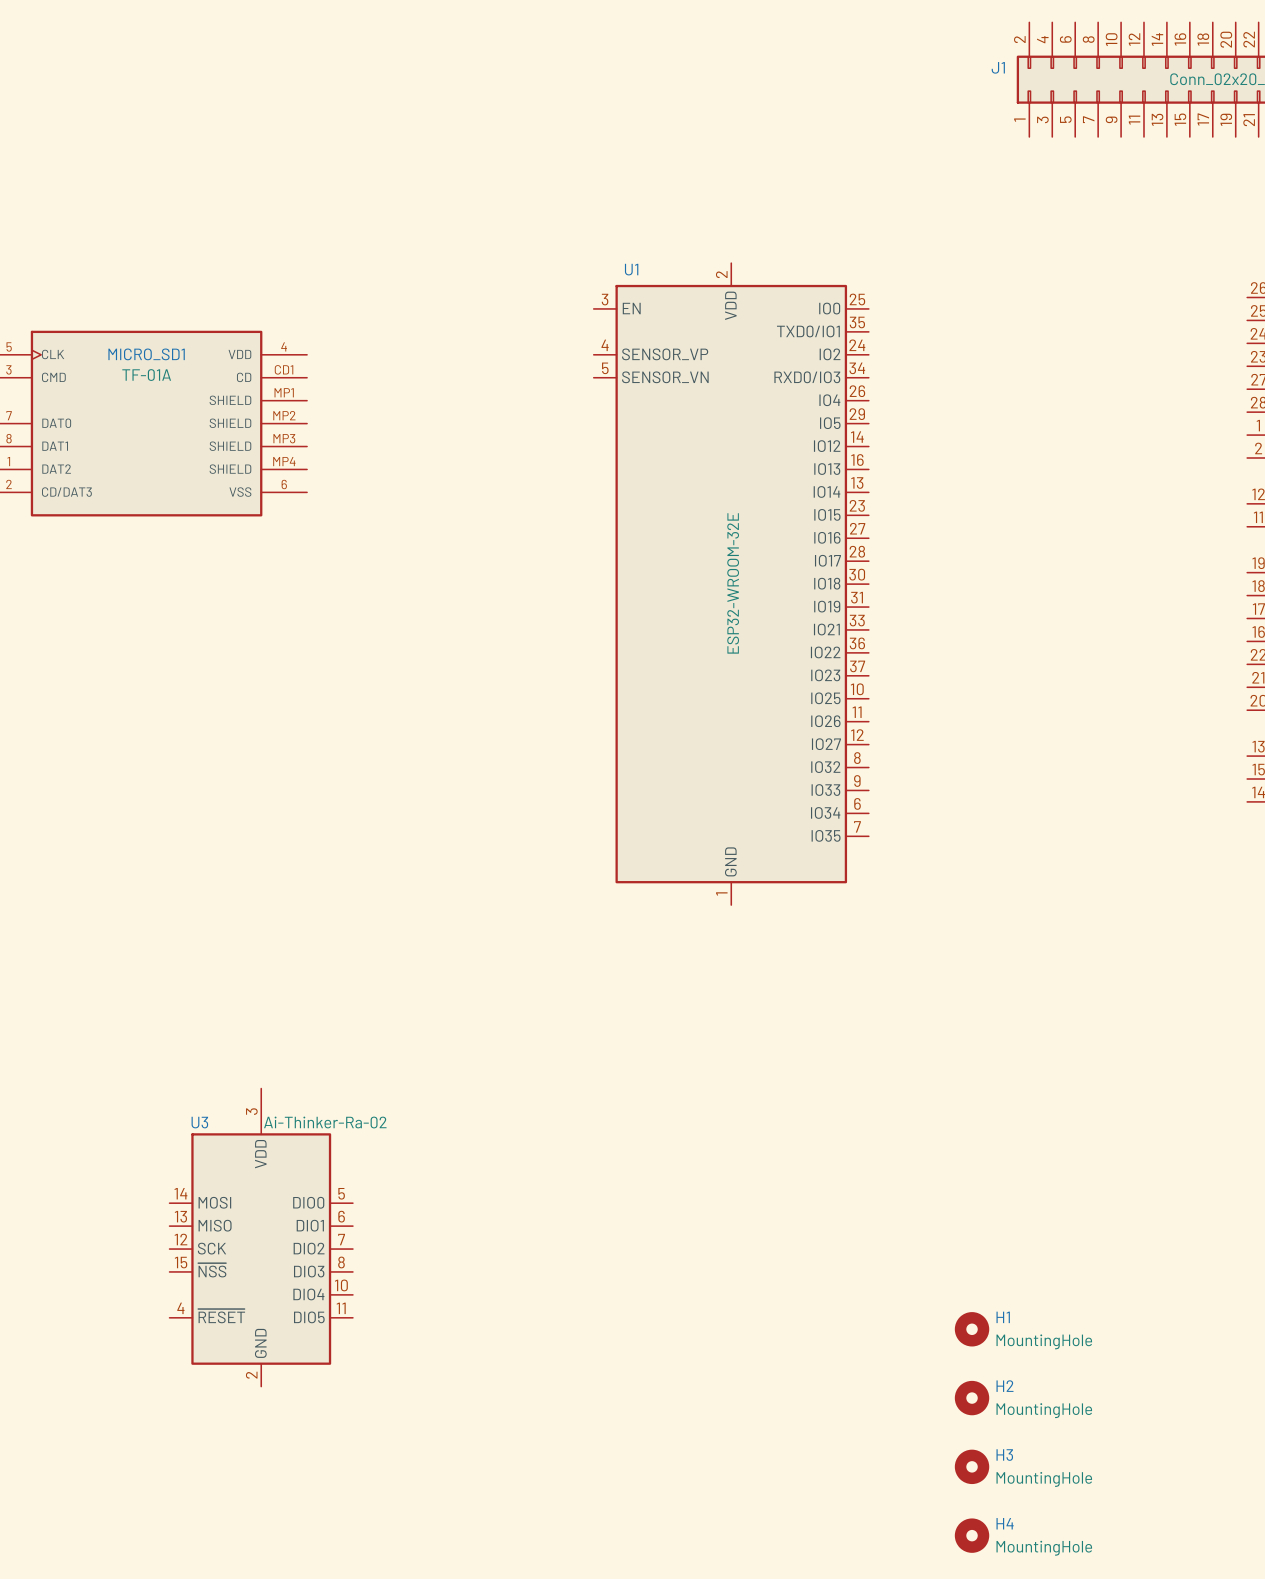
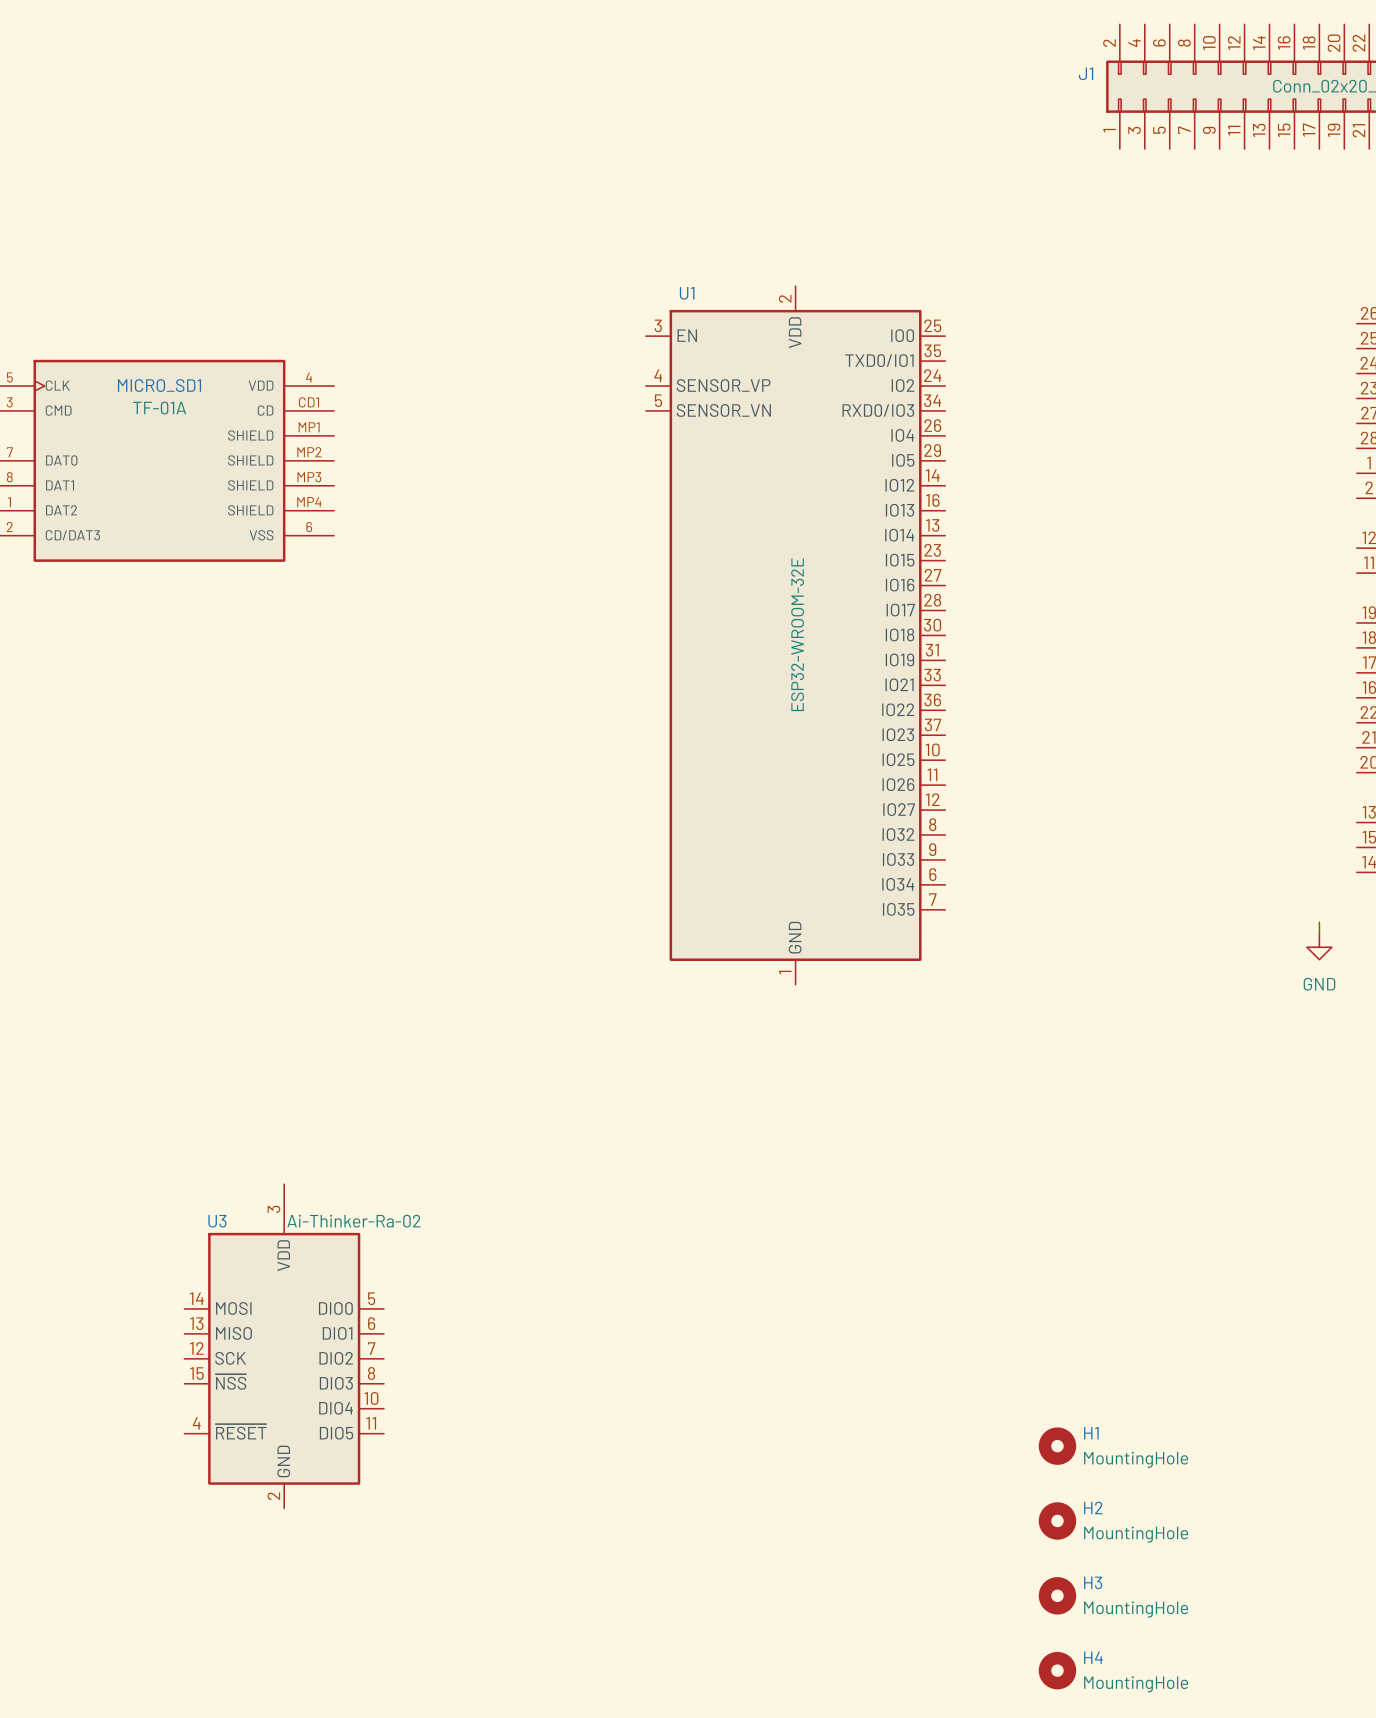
wire: none -> (1319, 922) (1319, 934)
power symbol: none -> GND (1319, 947)

